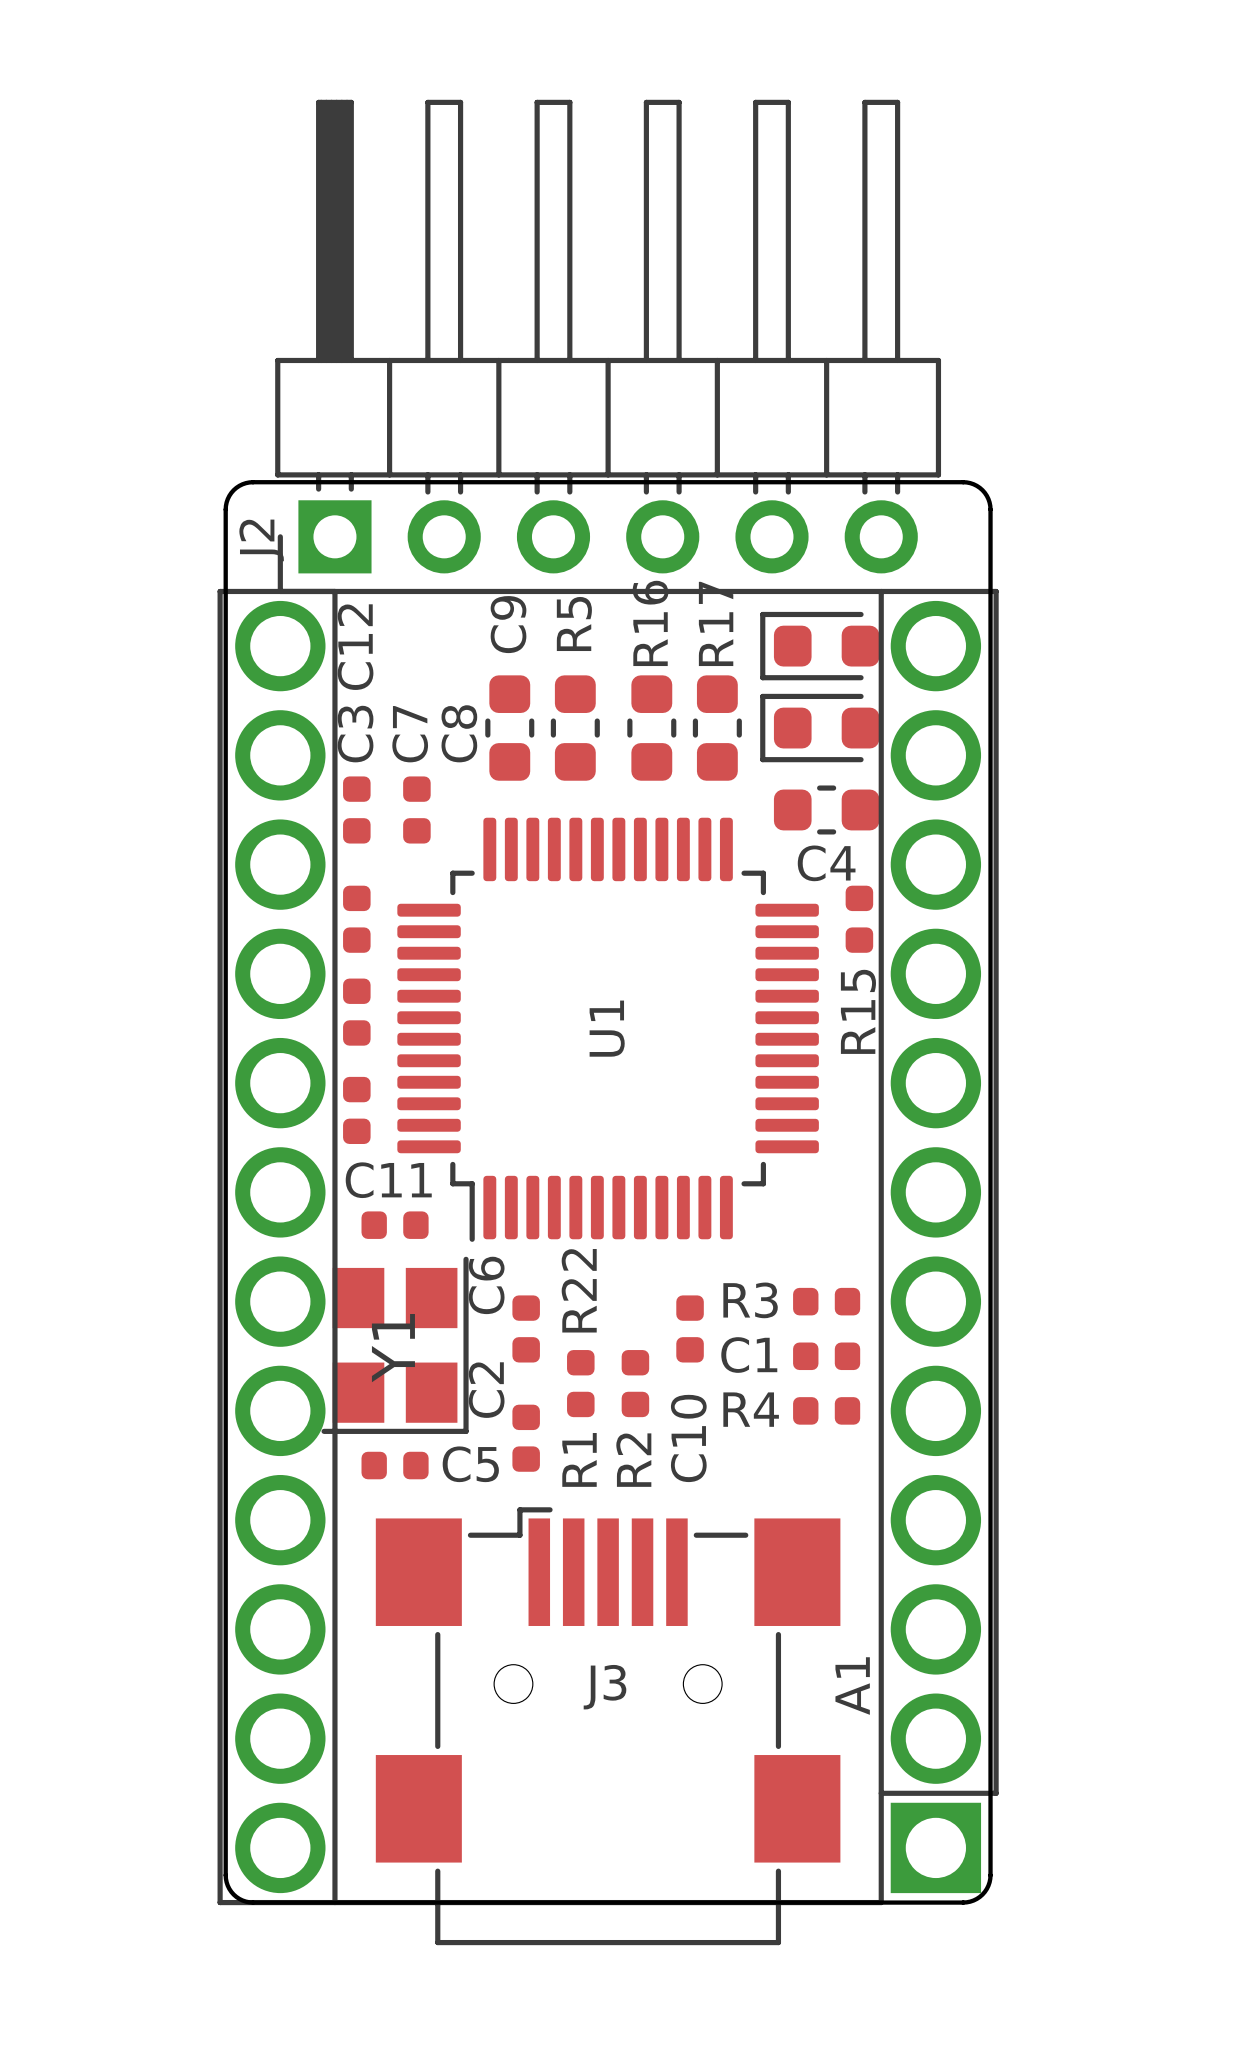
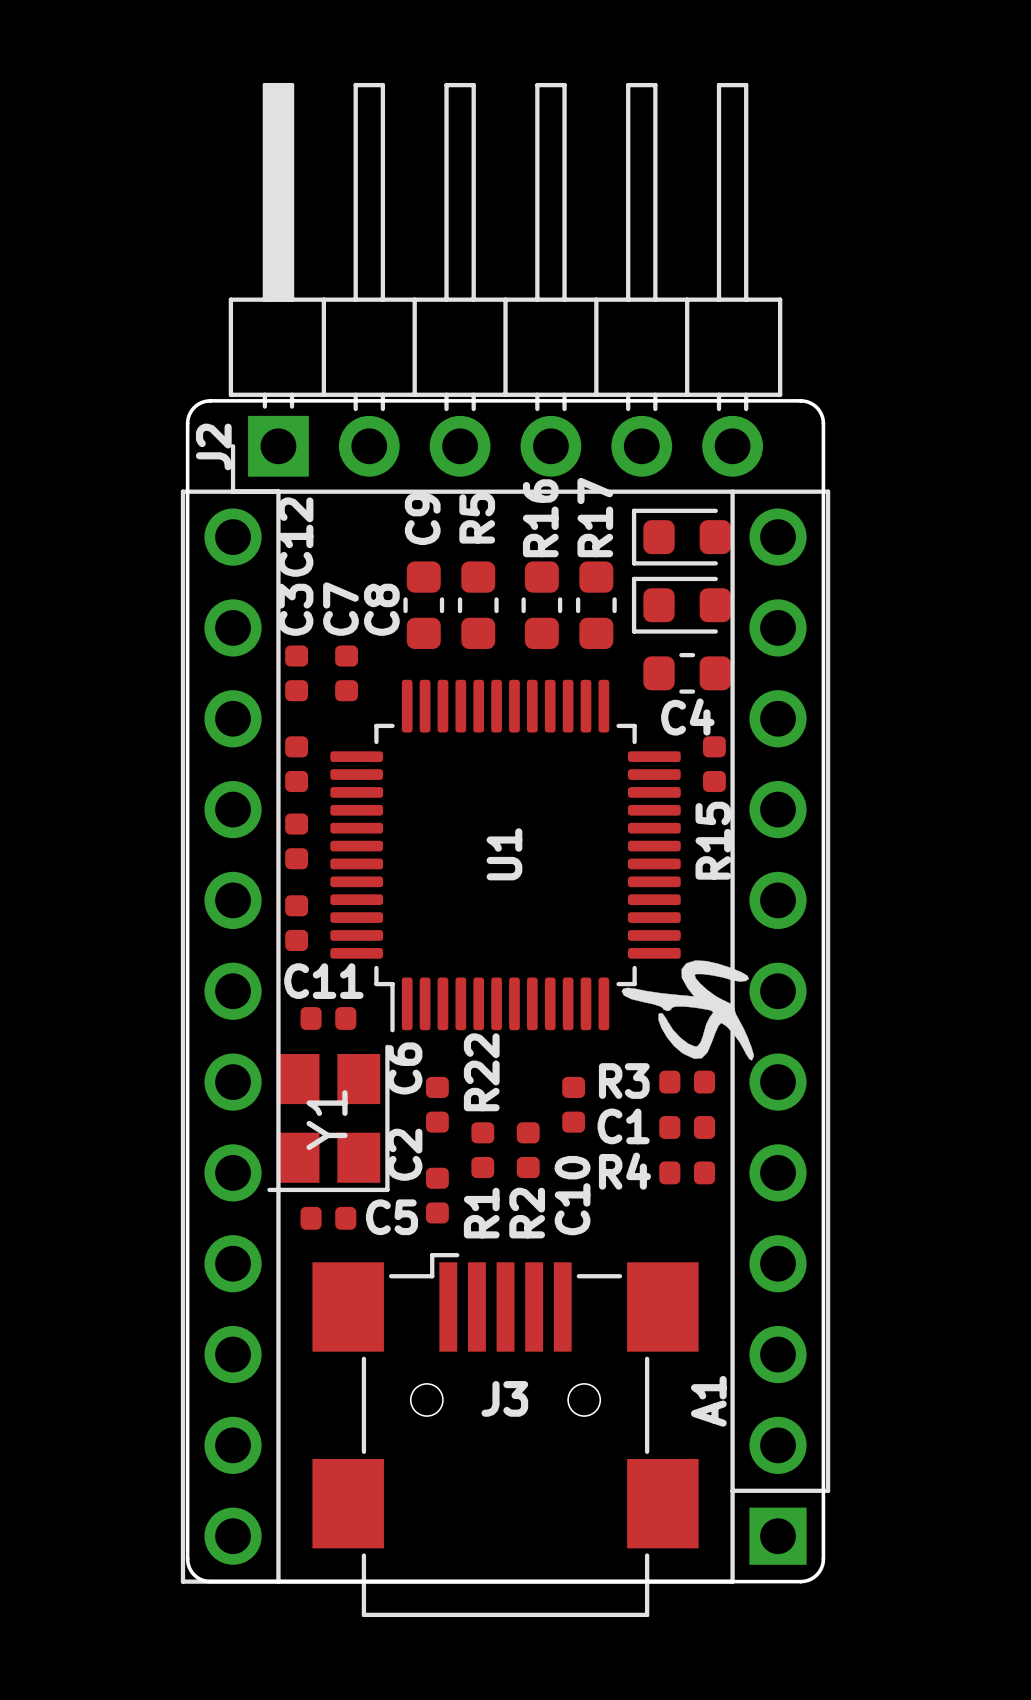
A1 footprint: [217, 588, 999, 1906] -> [180, 489, 831, 1584]
drawing: none -> [621, 960, 754, 1061]

